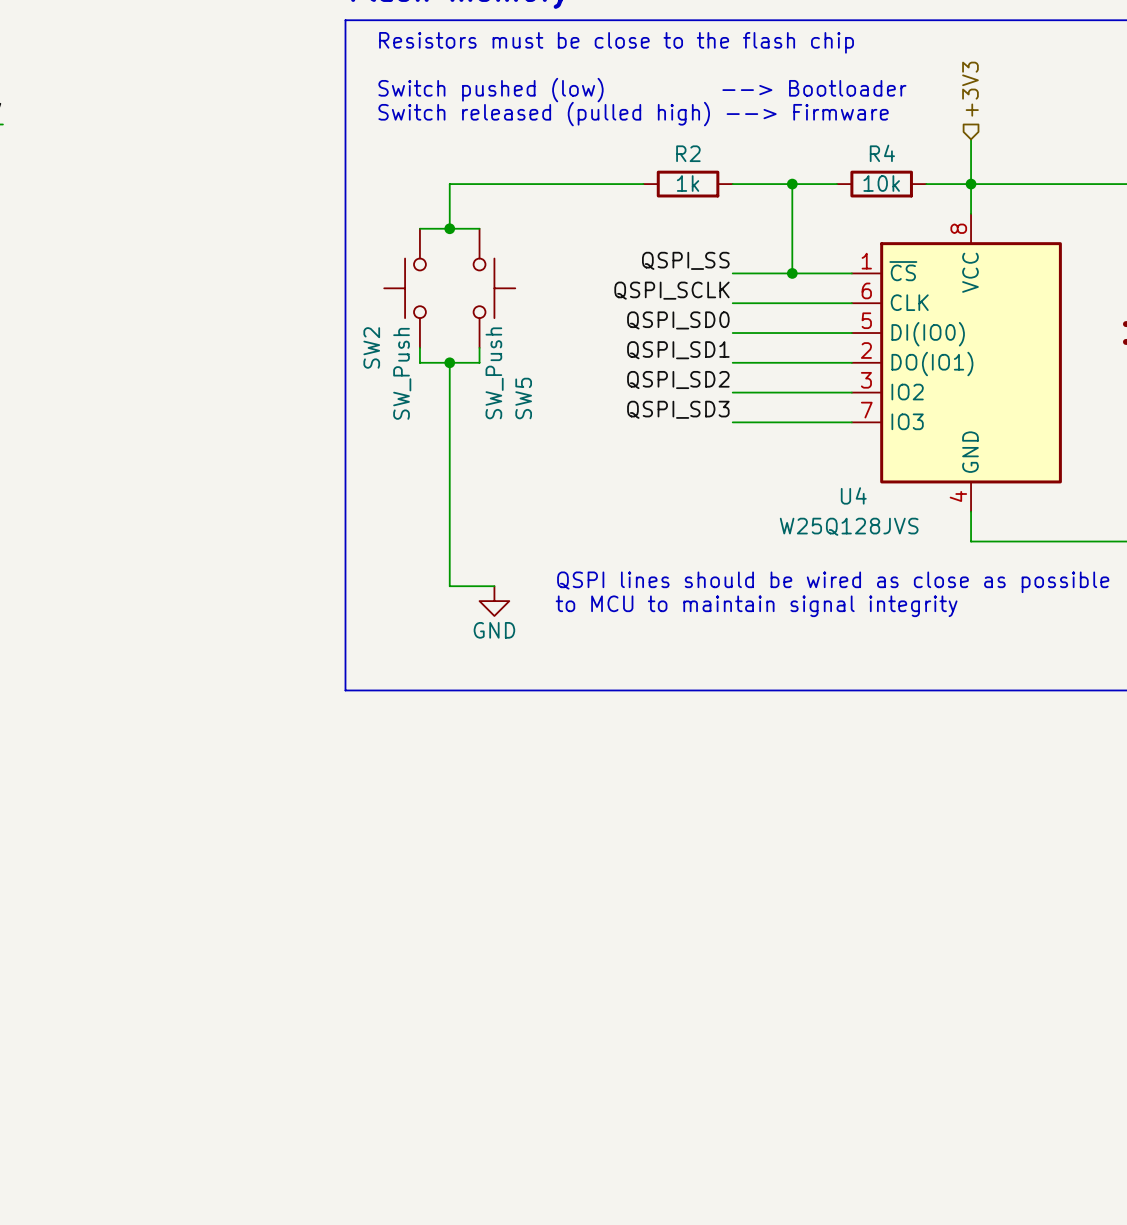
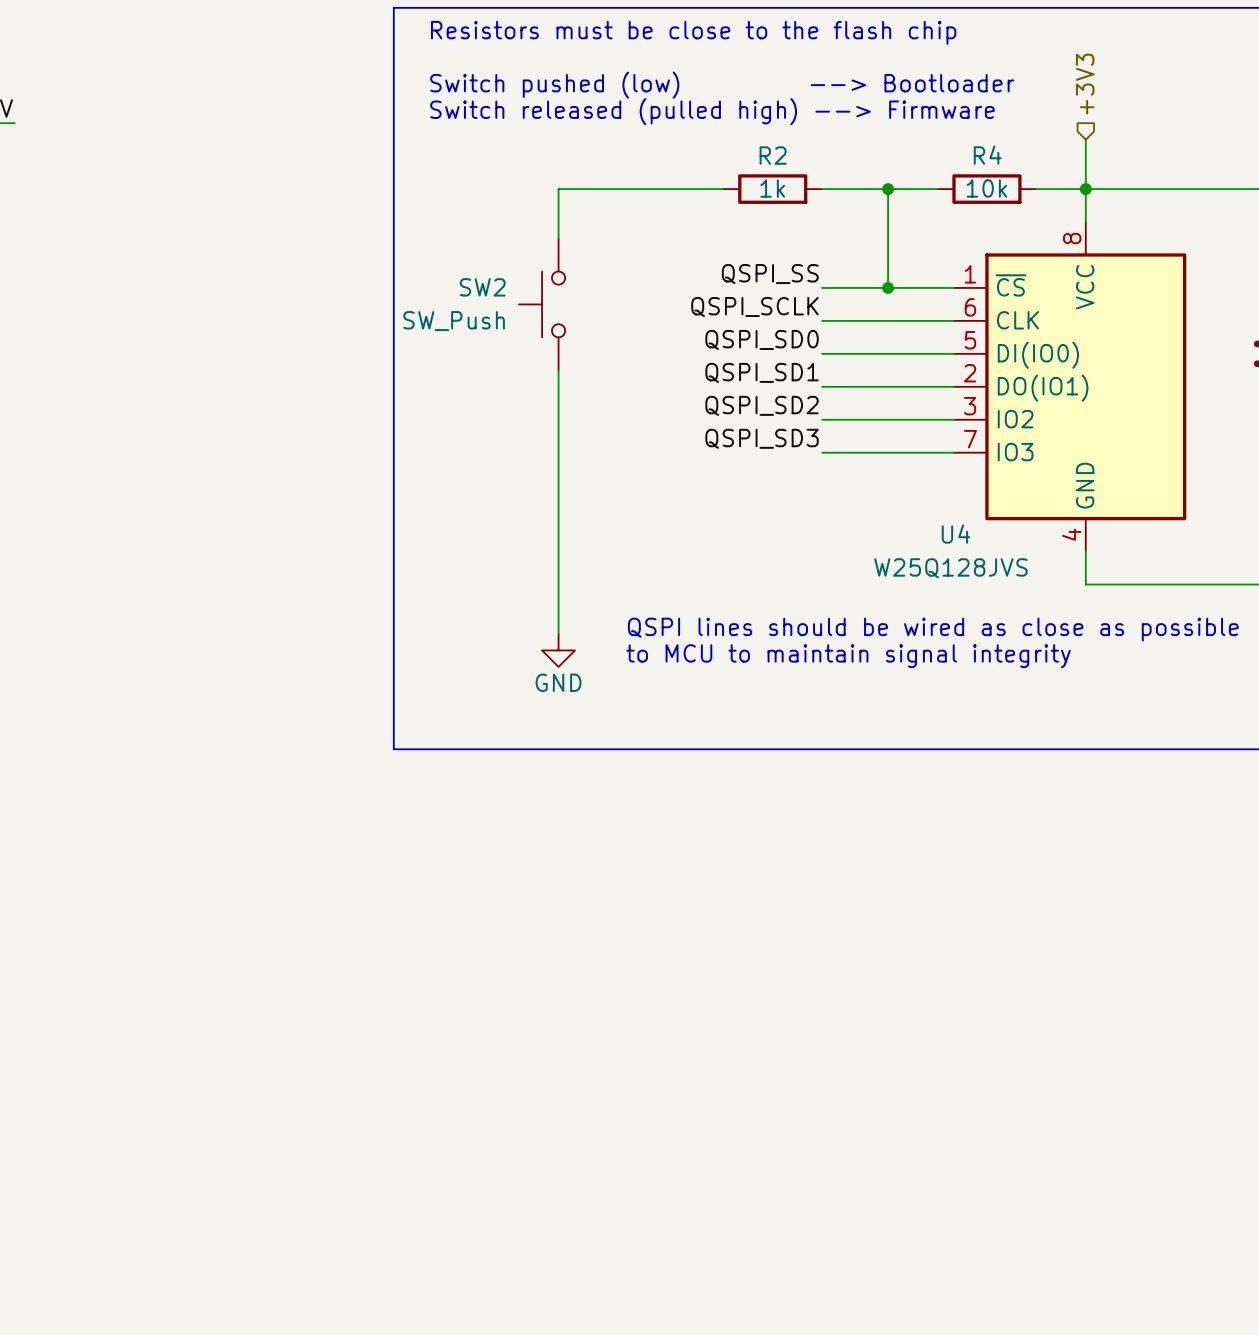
wire: (494, 184) (449, 184) (449, 228) -> (558, 189) (558, 238)
wire: (419, 228) (479, 228) -> none
junction: (449, 228) -> none
SW2 position: (405, 288) -> (542, 304)
SW5: SW_Push (494, 288) -> none
SW2 name rotation: 0° (371, 347) -> 90° clockwise (482, 287)
SW2 name position: SW2 (371, 347) -> SW2 (482, 287)
wire: (419, 347) (419, 362) (479, 362) (479, 347) -> none
wire: (449, 362) (449, 586) (494, 586) -> (558, 370) (558, 633)
junction: (449, 362) -> none
SW2 value rotation: 0° (402, 373) -> 90° clockwise (454, 321)

